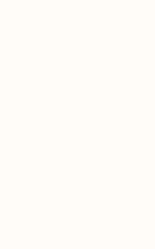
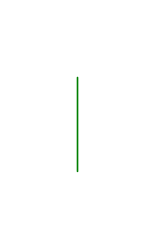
wire: none -> (77, 77) (77, 171)

